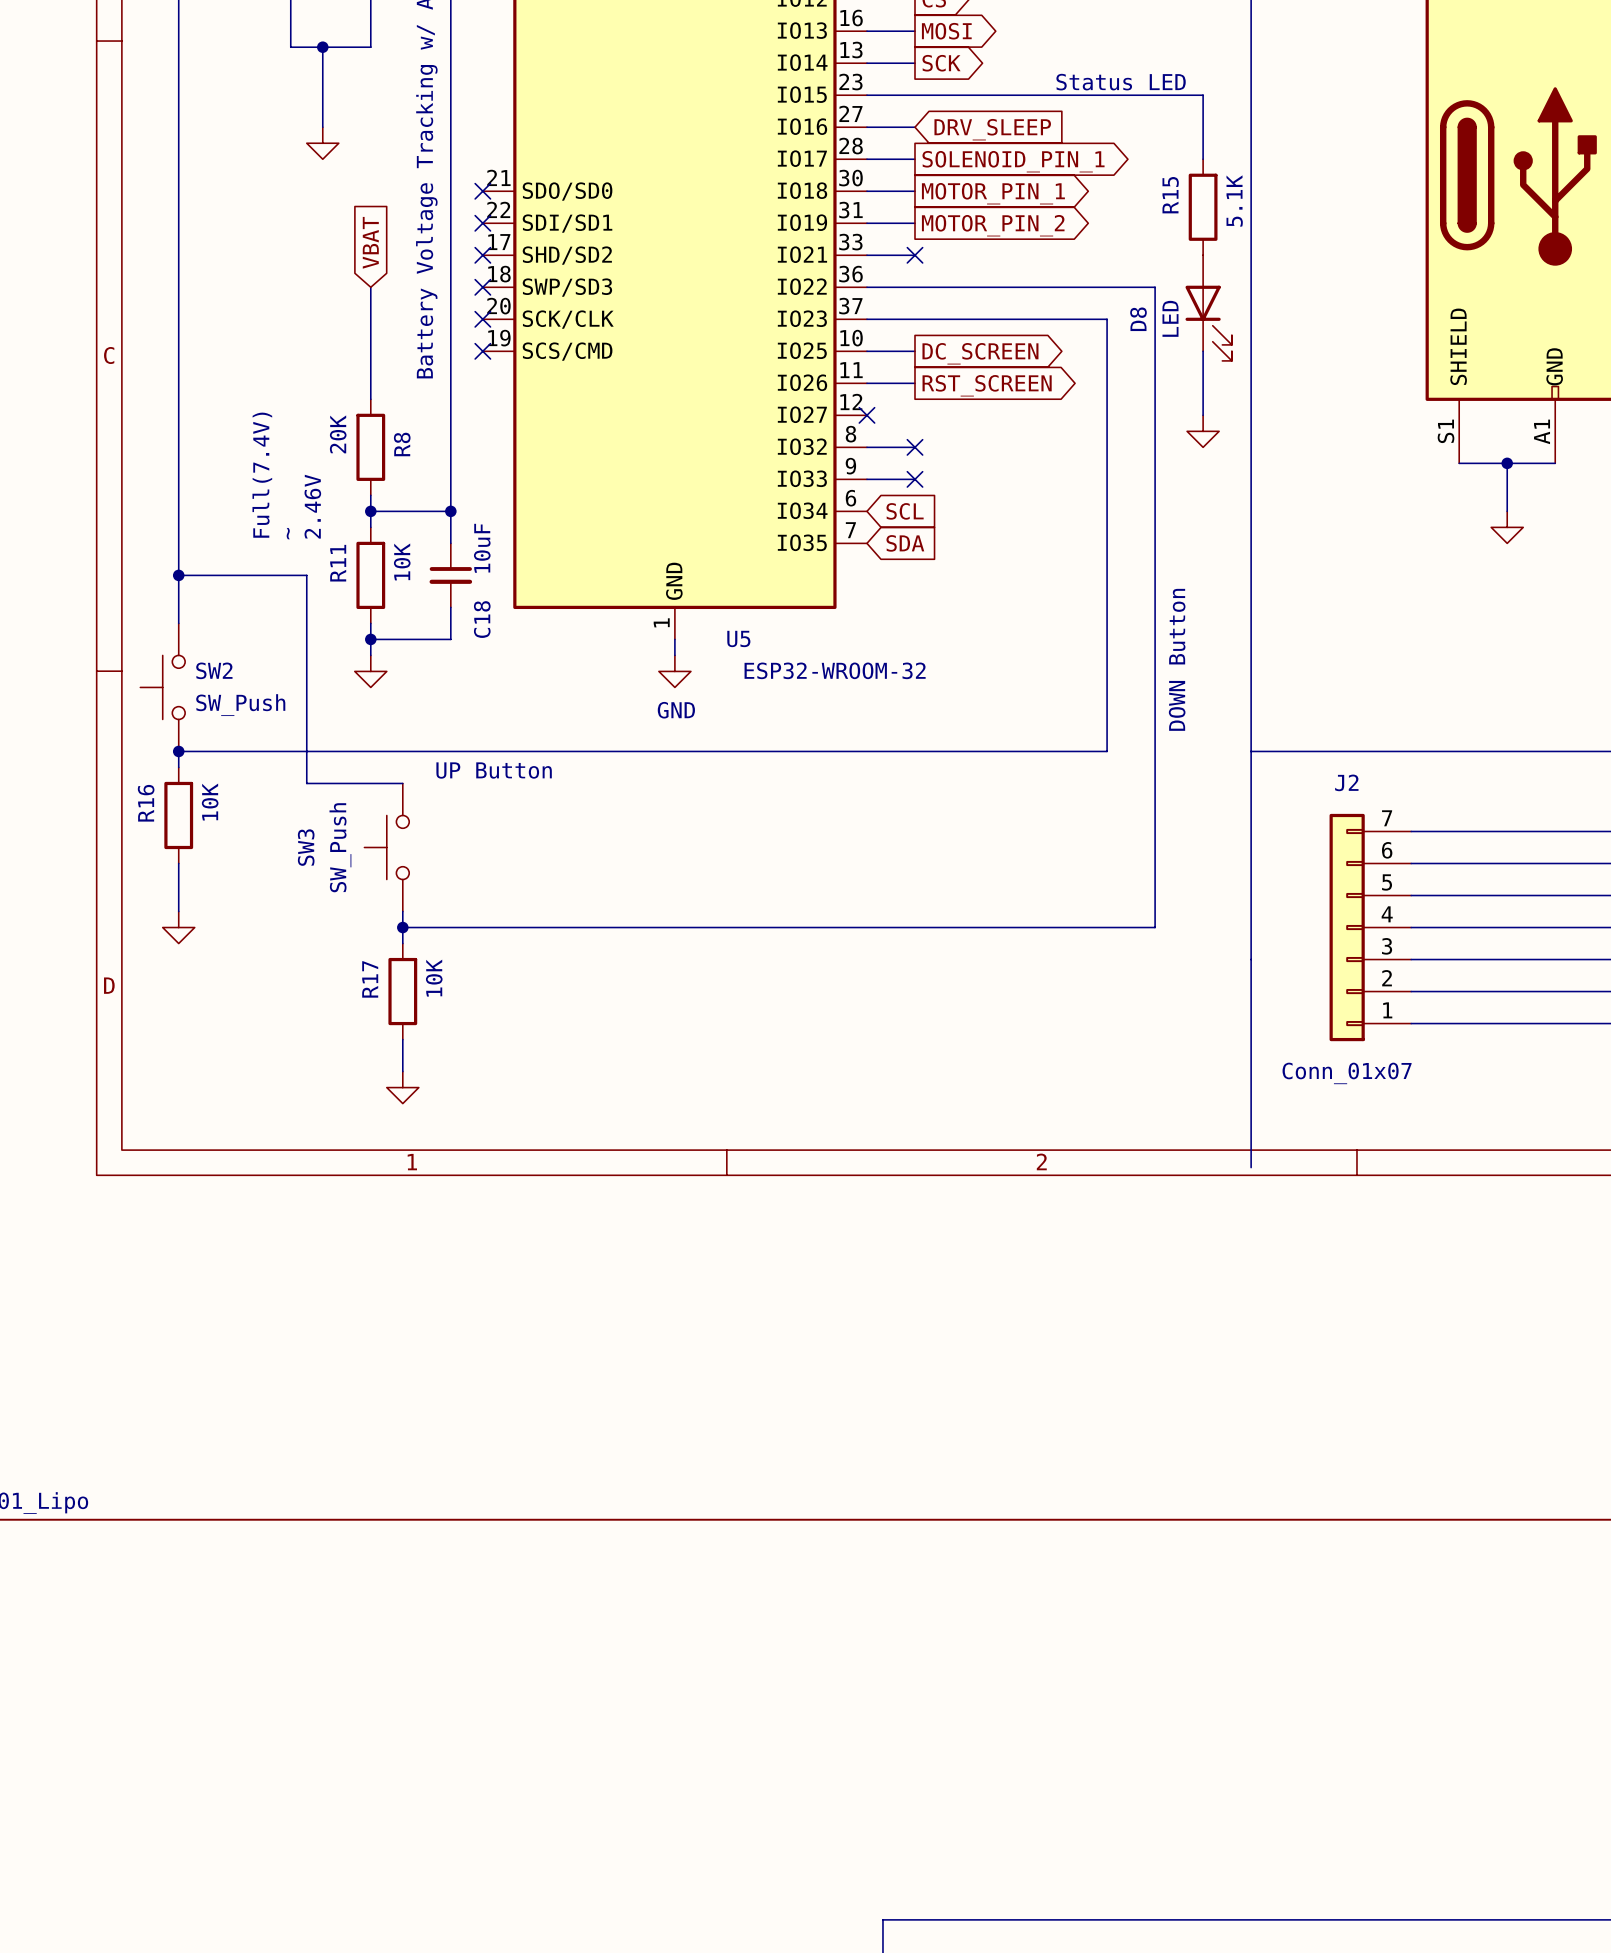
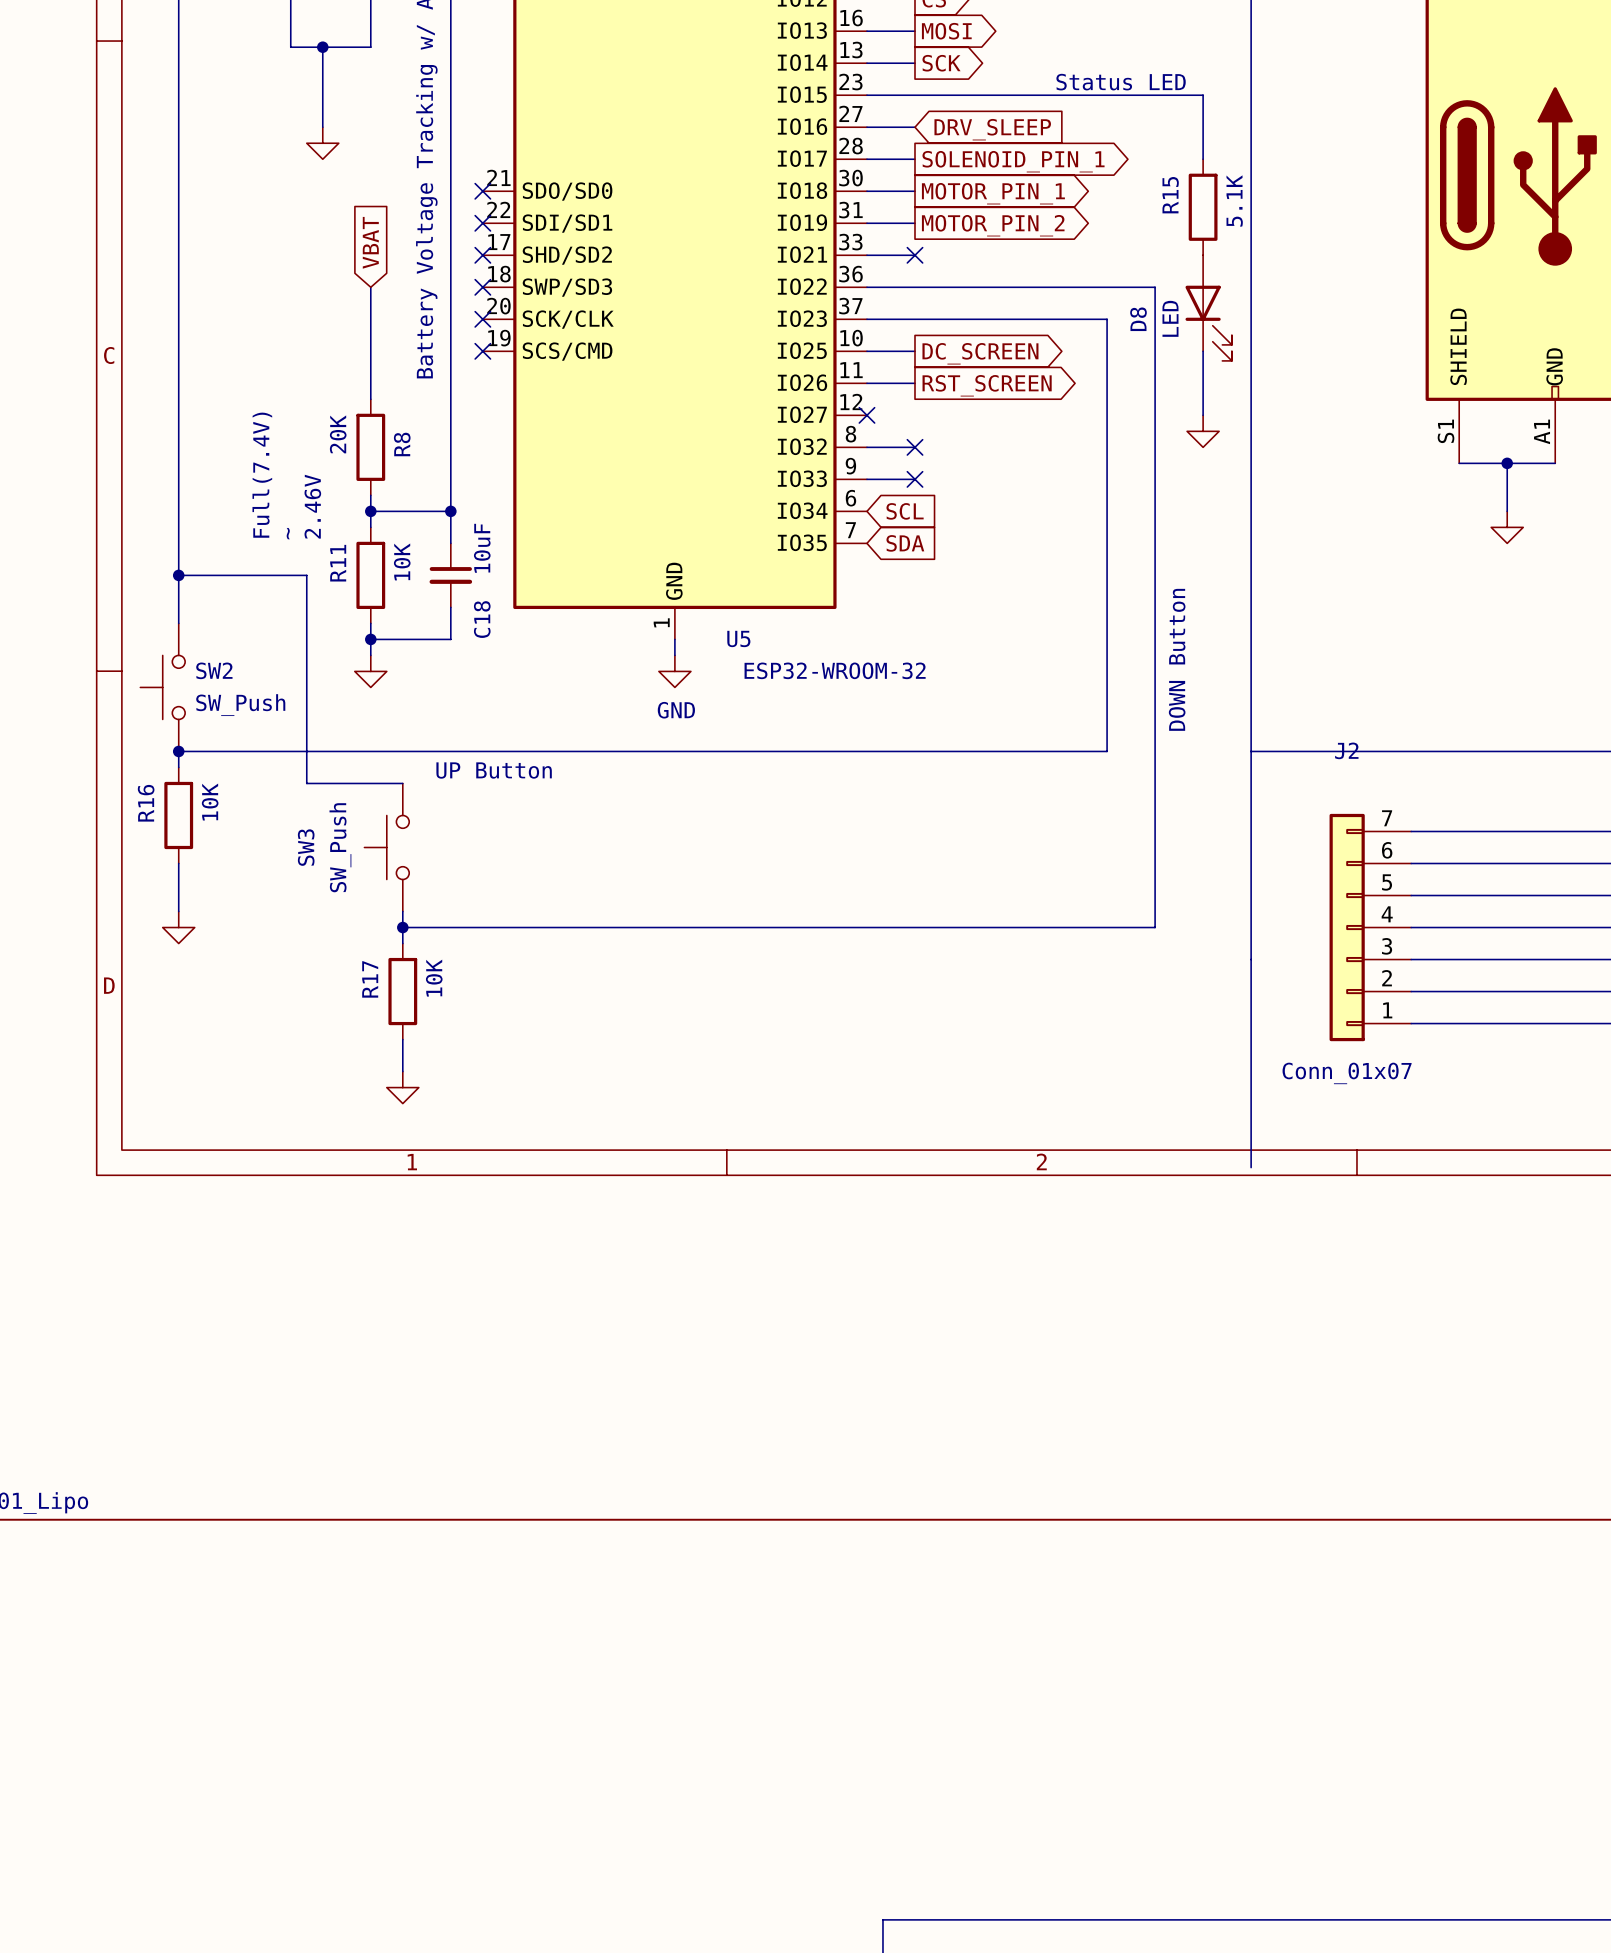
J2 name position: J2 (1346, 782) -> J2 (1346, 750)

